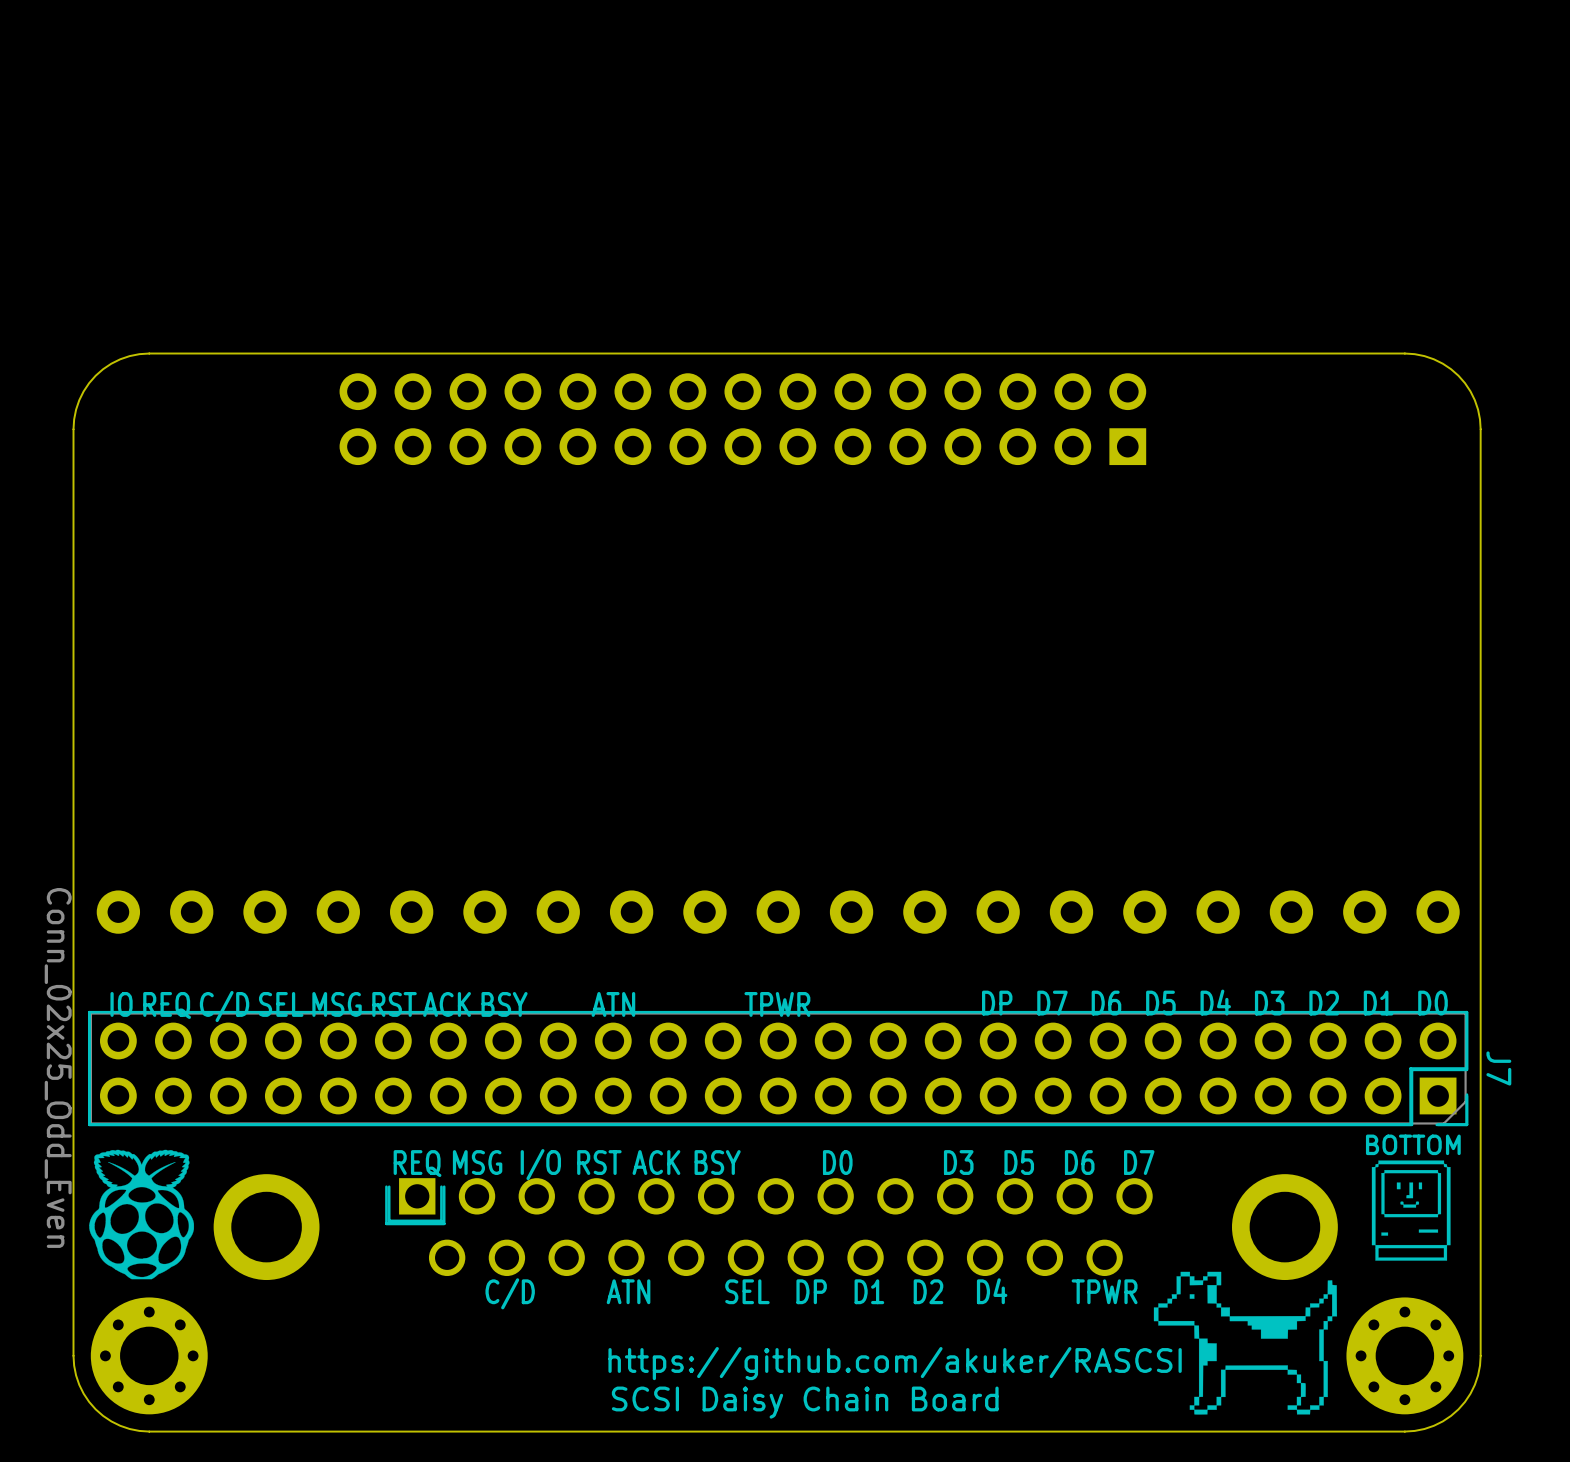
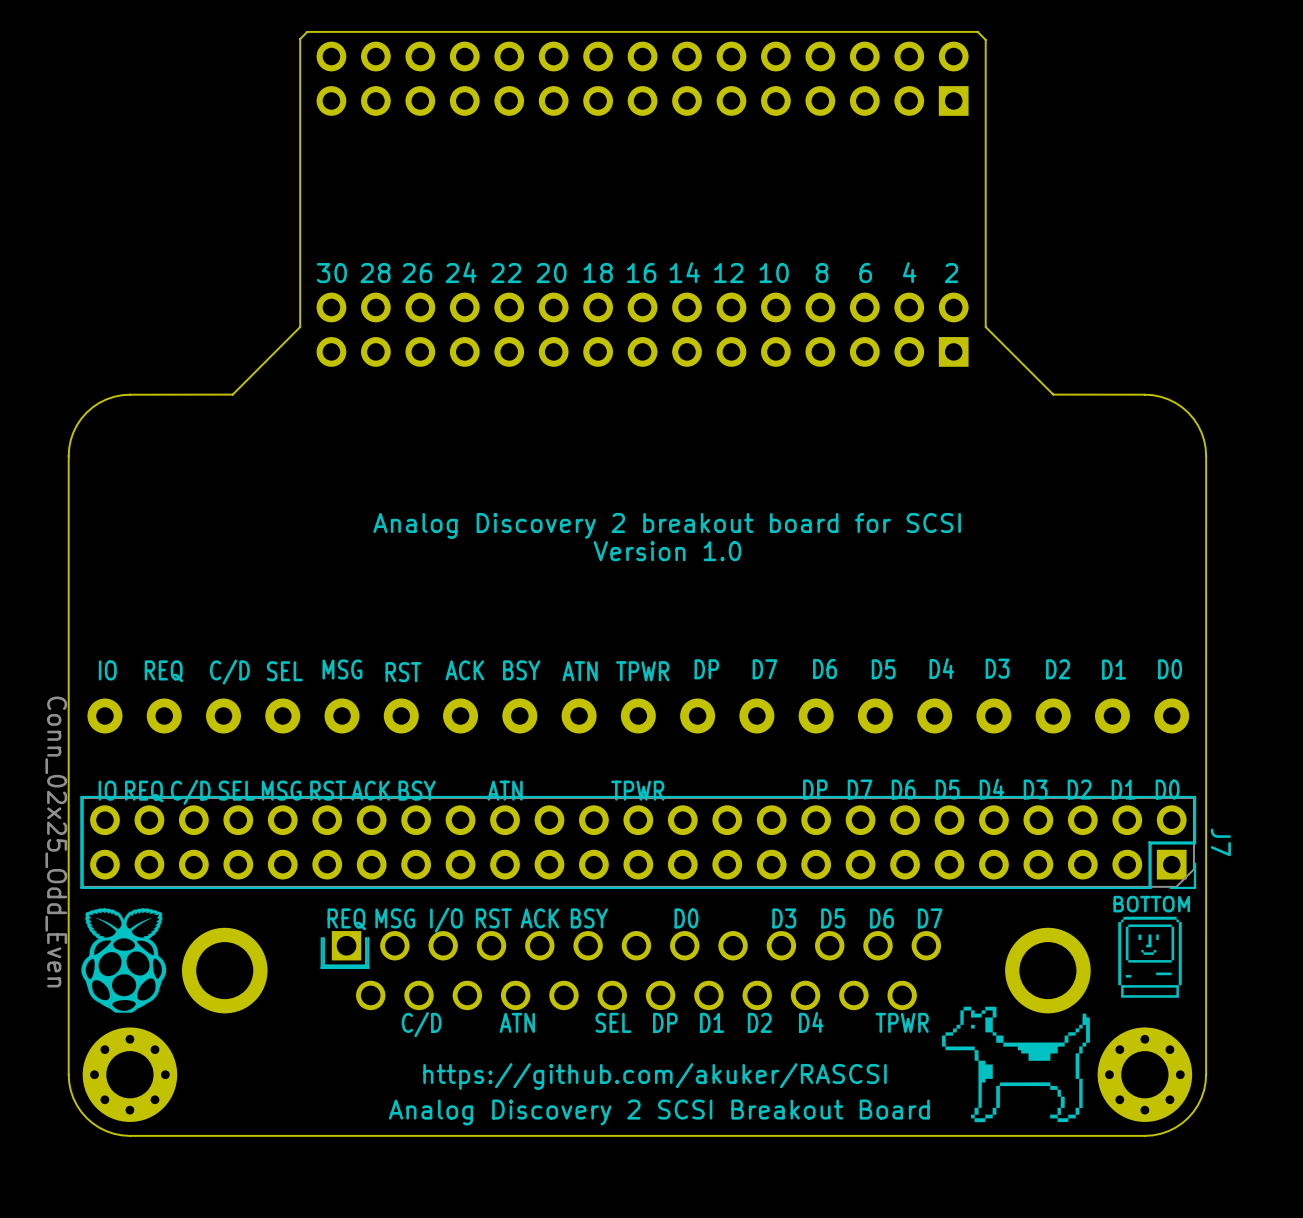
part: none -> (642, 78)
text: none -> 24 (461, 272)
text: none -> 14 (684, 272)
text: none -> 4 (909, 272)
text: none -> 30 (331, 273)
text: none -> 28 (375, 273)
text: none -> 26 (417, 273)
text: none -> 22 (506, 273)
text: none -> 20 (551, 273)
text: none -> 18 (598, 273)
text: none -> 16 (641, 273)
text: none -> 12 (728, 273)
text: none -> 10 (774, 273)
text: none -> 8 (822, 273)
text: none -> 6 (865, 273)
text: none -> 2 (951, 273)
part position: (742, 419) -> (642, 329)
board edge: (73, 590) (73, 429) (76, 409) (89, 383) (103, 369) (120, 359) (139, 354) (1404, 353) (1424, 356) (1442, 363) (1458, 375) (1470, 391) (1478, 409) (1480, 429) (1480, 1355) -> (68, 455) (70, 440) (76, 425) (86, 412) (99, 402) (114, 396) (129, 394) (232, 394) (300, 327) (300, 39) (307, 31) (977, 31) (985, 39) (985, 327) (1053, 394) (1144, 394) (1160, 396) (1175, 402) (1188, 412) (1197, 425) (1204, 440) (1206, 455) (1206, 1074)
text: none -> Analog Discovery 2 breakout board for SCSI (667, 525)
text: none -> Version 1.0 (667, 551)
text: none -> D6 (825, 669)
text: none -> D4 (941, 668)
text: none -> D3 (997, 668)
text: none -> MSG (342, 669)
text: none -> DP (706, 669)
text: none -> D7 (764, 669)
text: none -> D5 (883, 669)
text: none -> D2 (1058, 669)
text: none -> D1 (1114, 669)
text: none -> D0 (1170, 669)
text: none -> IO (107, 670)
text: none -> ACK (464, 670)
text: none -> BSY (521, 670)
text: none -> REQ (164, 671)
text: none -> SEL (284, 671)
text: none -> ATN (580, 671)
text: none -> TPWR (642, 671)
text: none -> C/D (229, 672)
text: none -> RST (403, 672)
text position: https://github.com/akuker/RASCSI (895, 1363) -> https://github.com/akuker/RASCSI (655, 1076)
text: SCSI Daisy Chain Board (805, 1402) -> Analog Discovery 2 SCSI Breakout Board (659, 1112)

